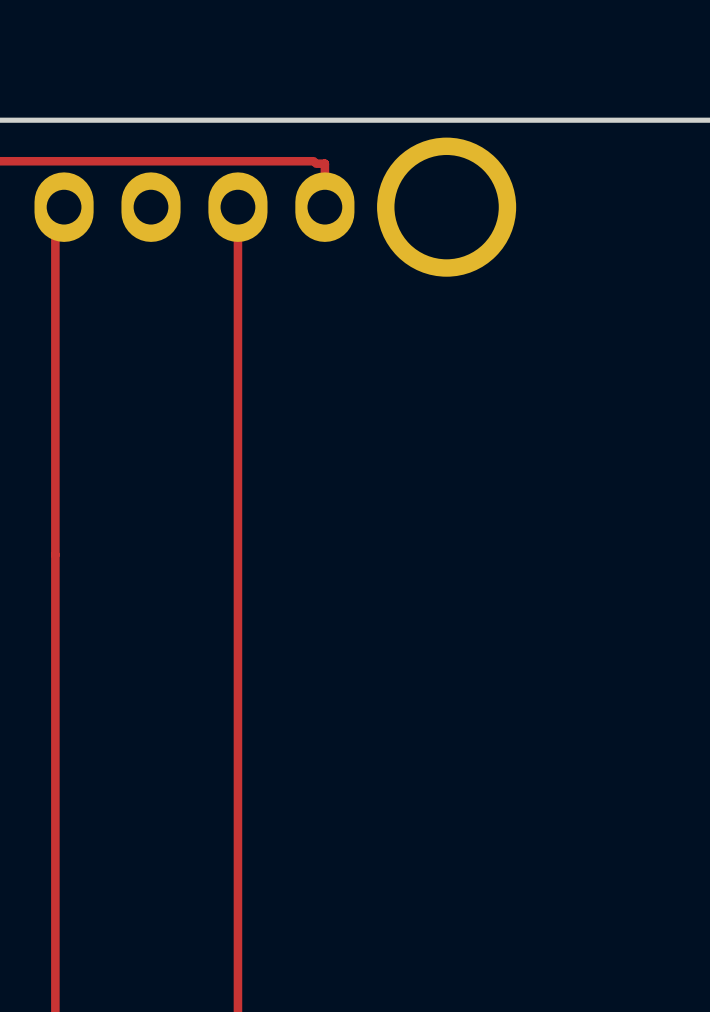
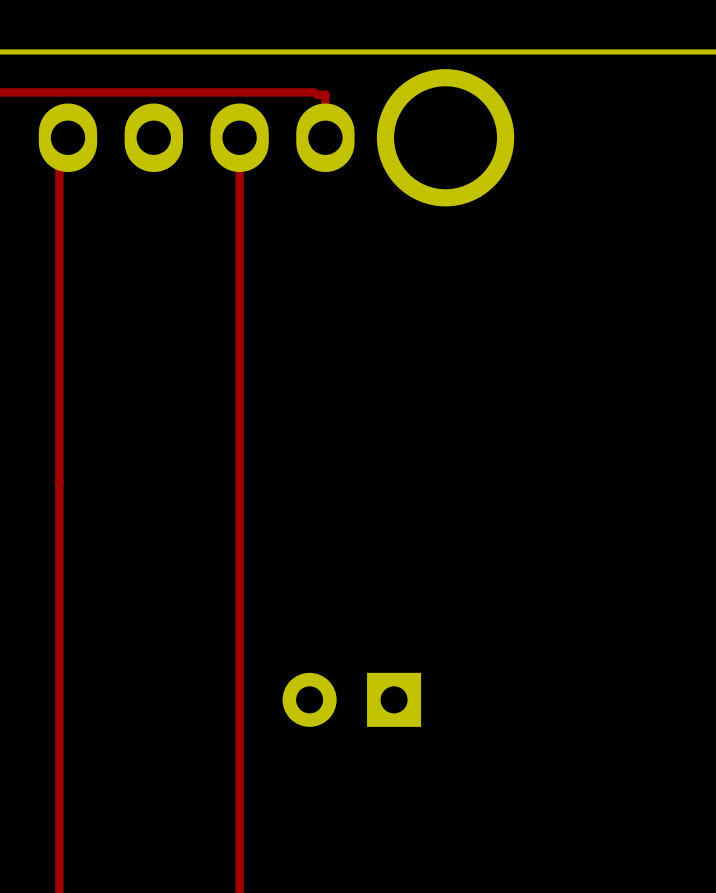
part: none -> (351, 699)

